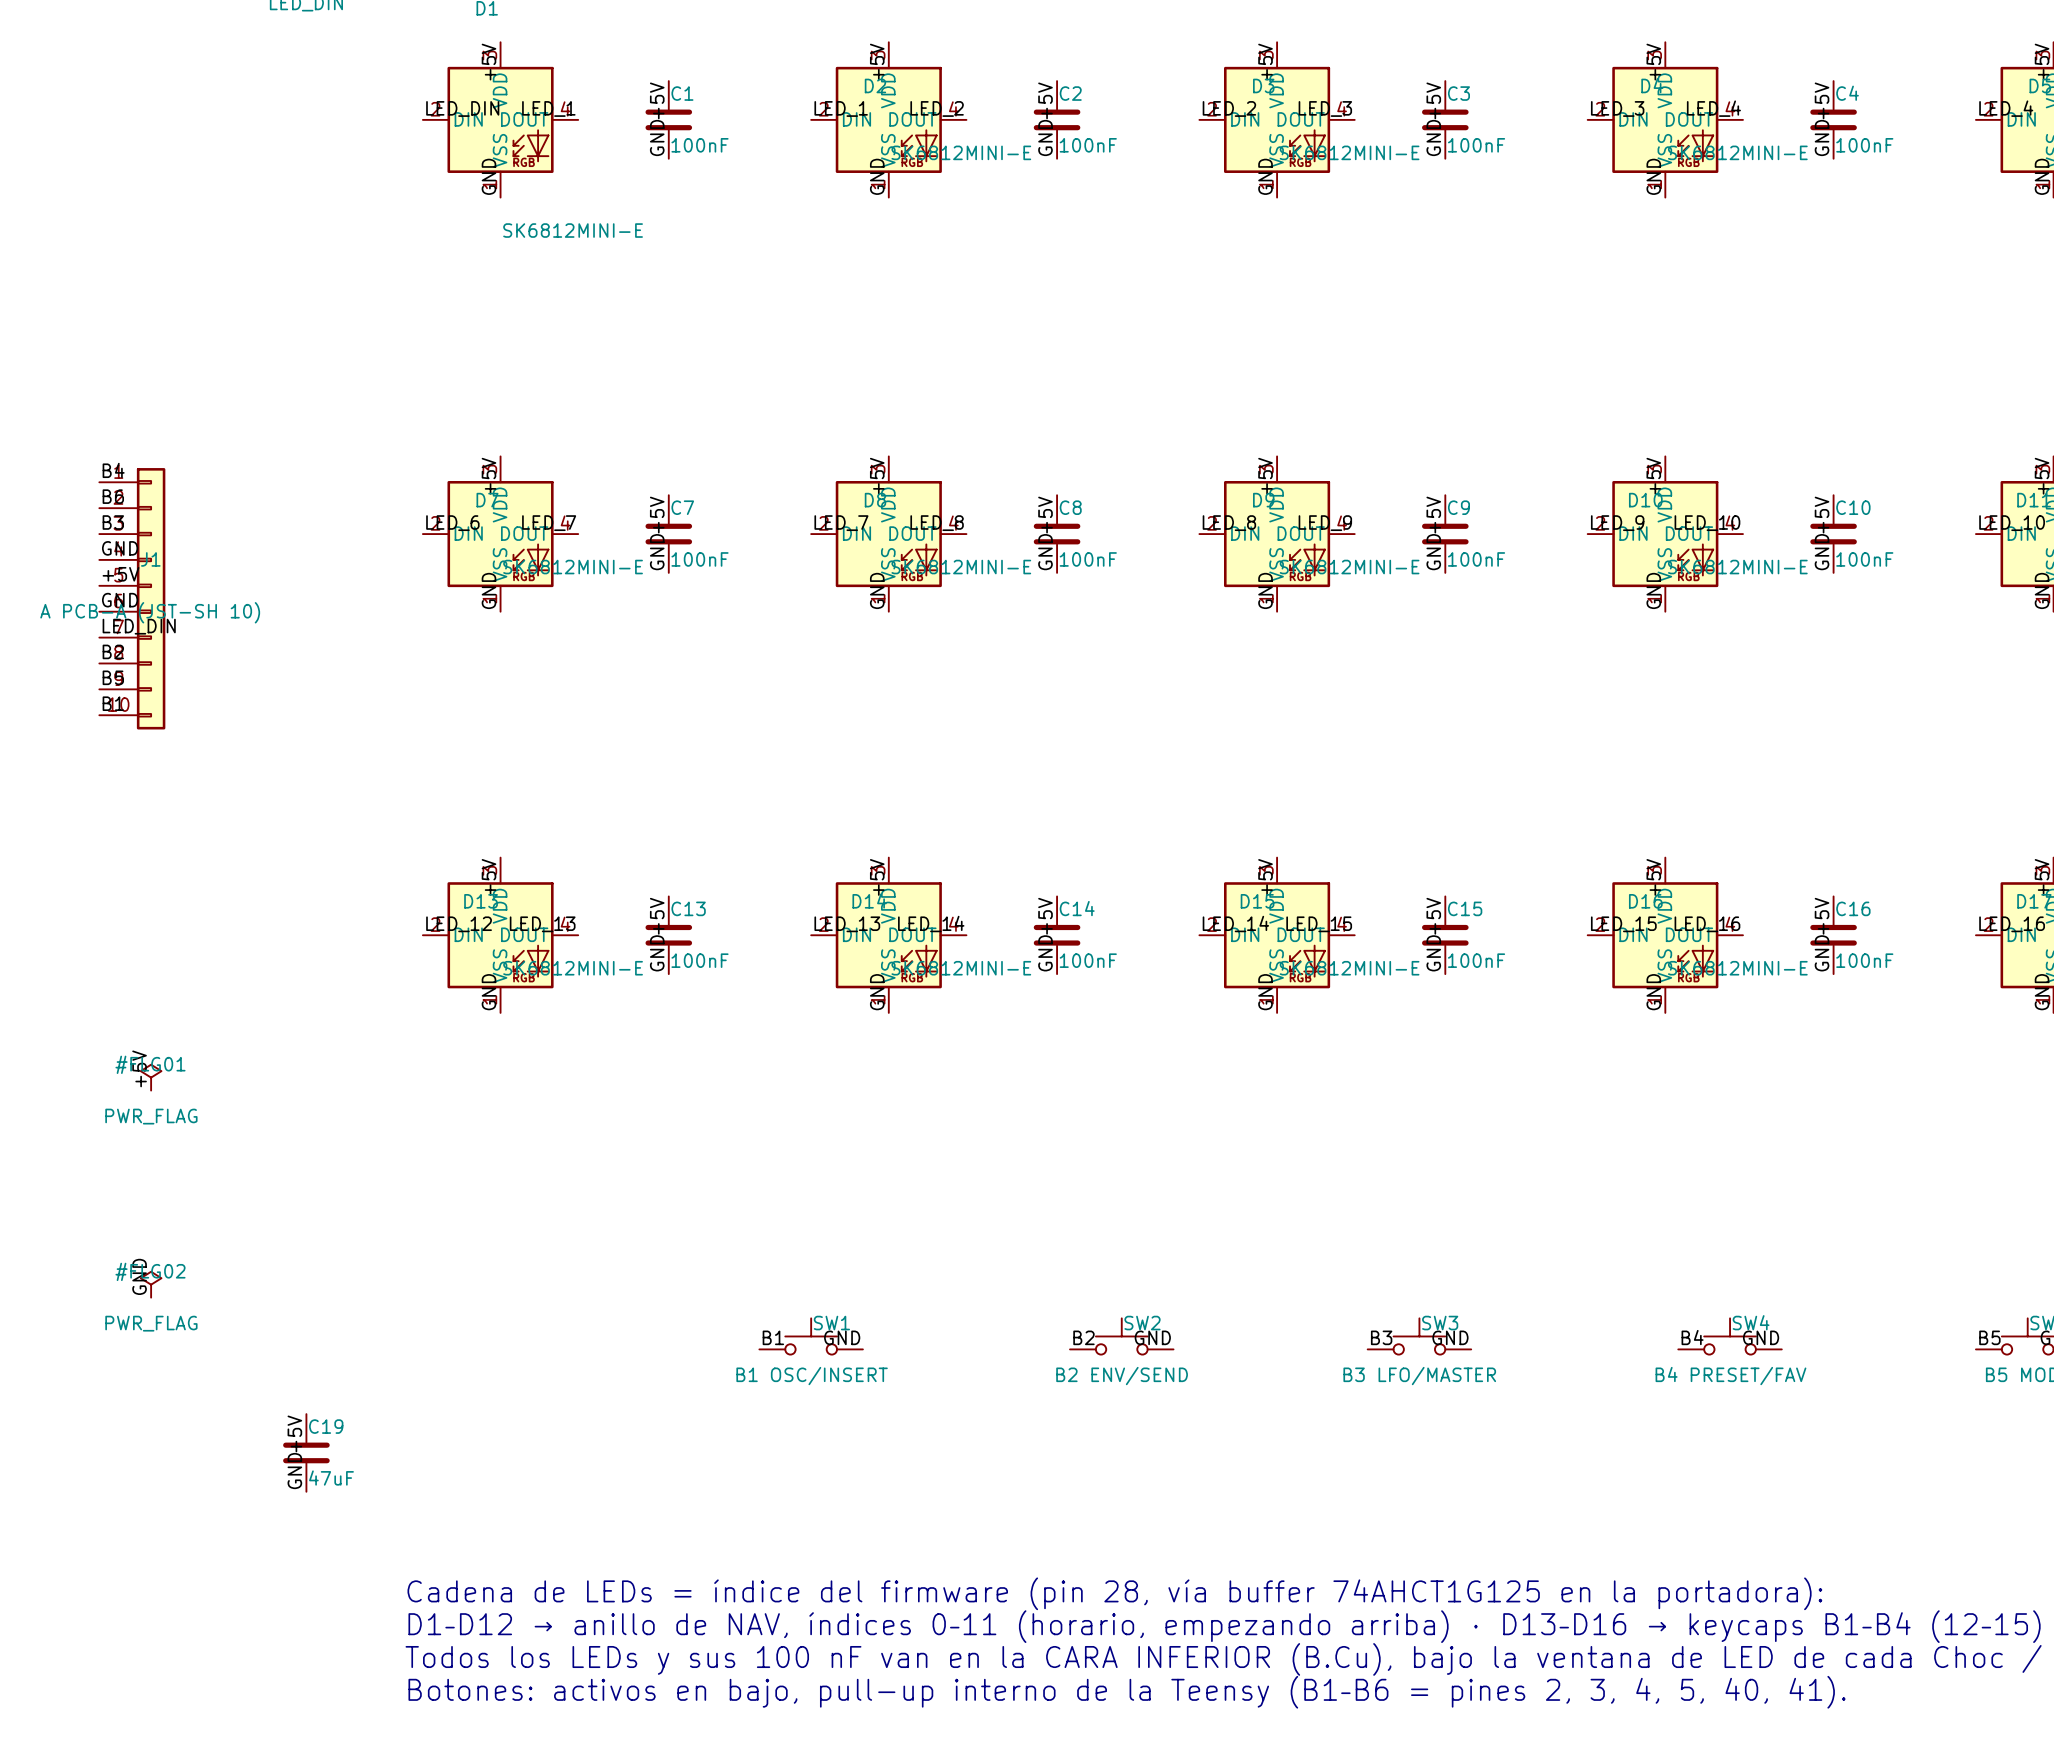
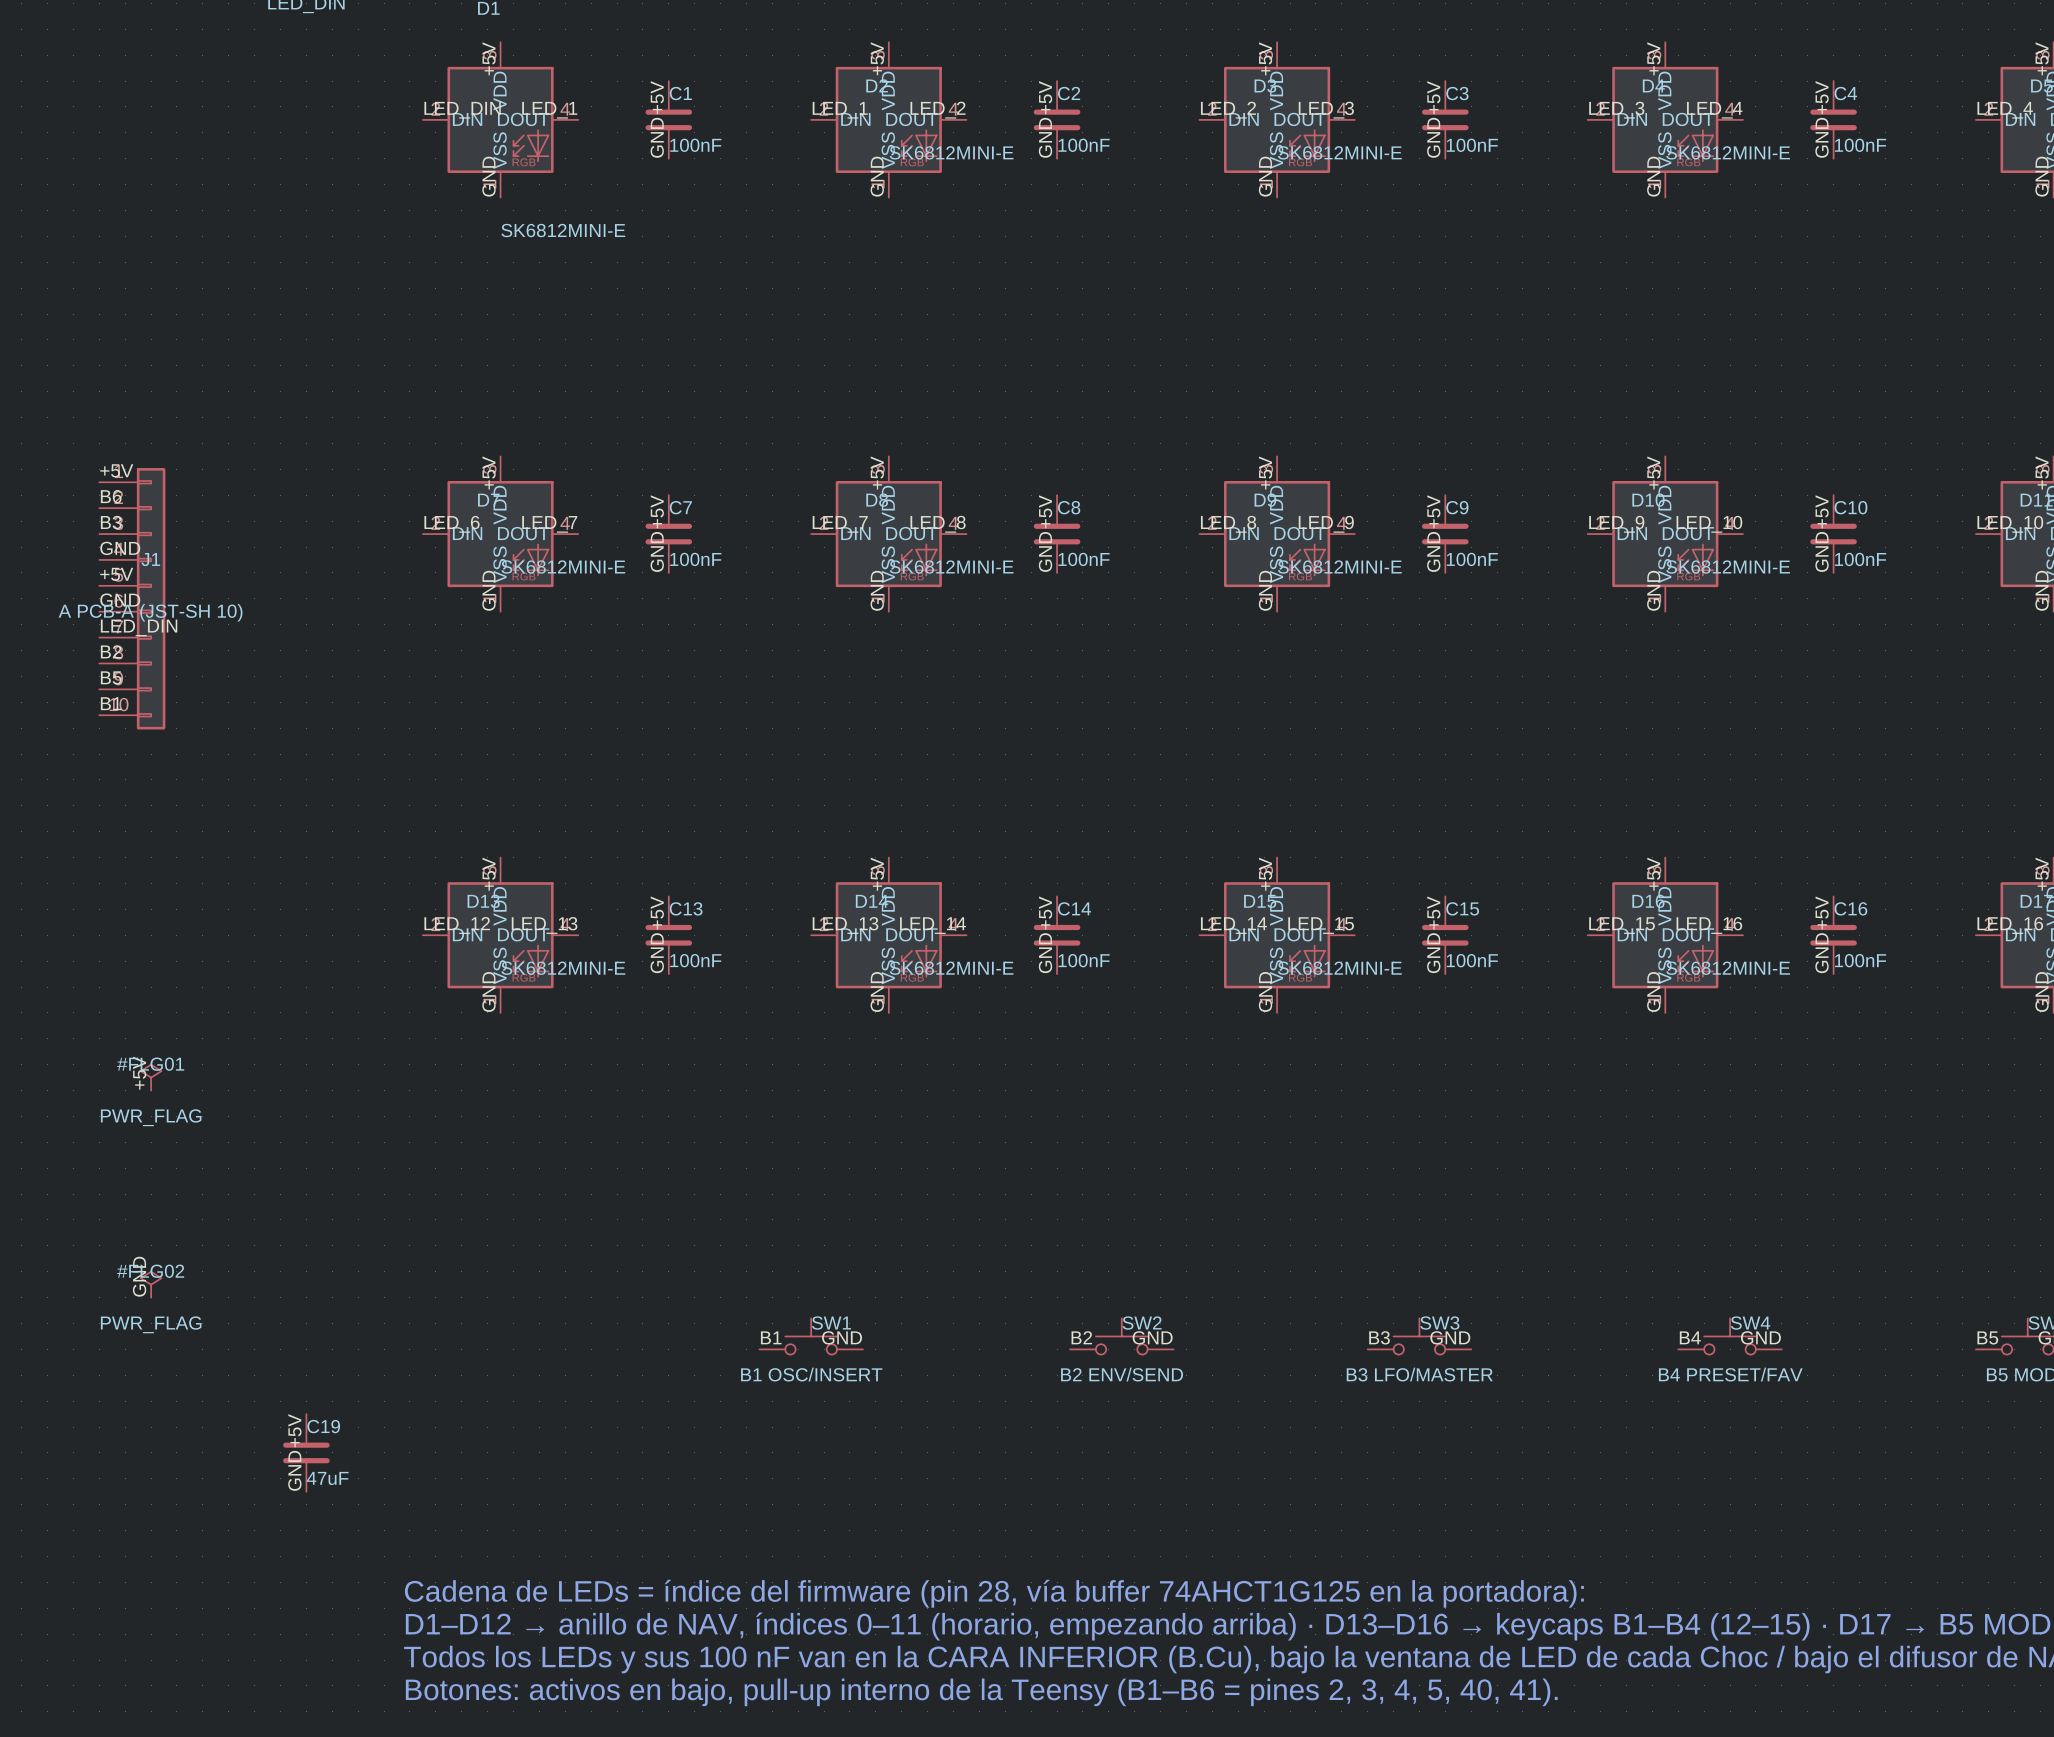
label: B4 (113, 470) -> +5V (116, 470)

